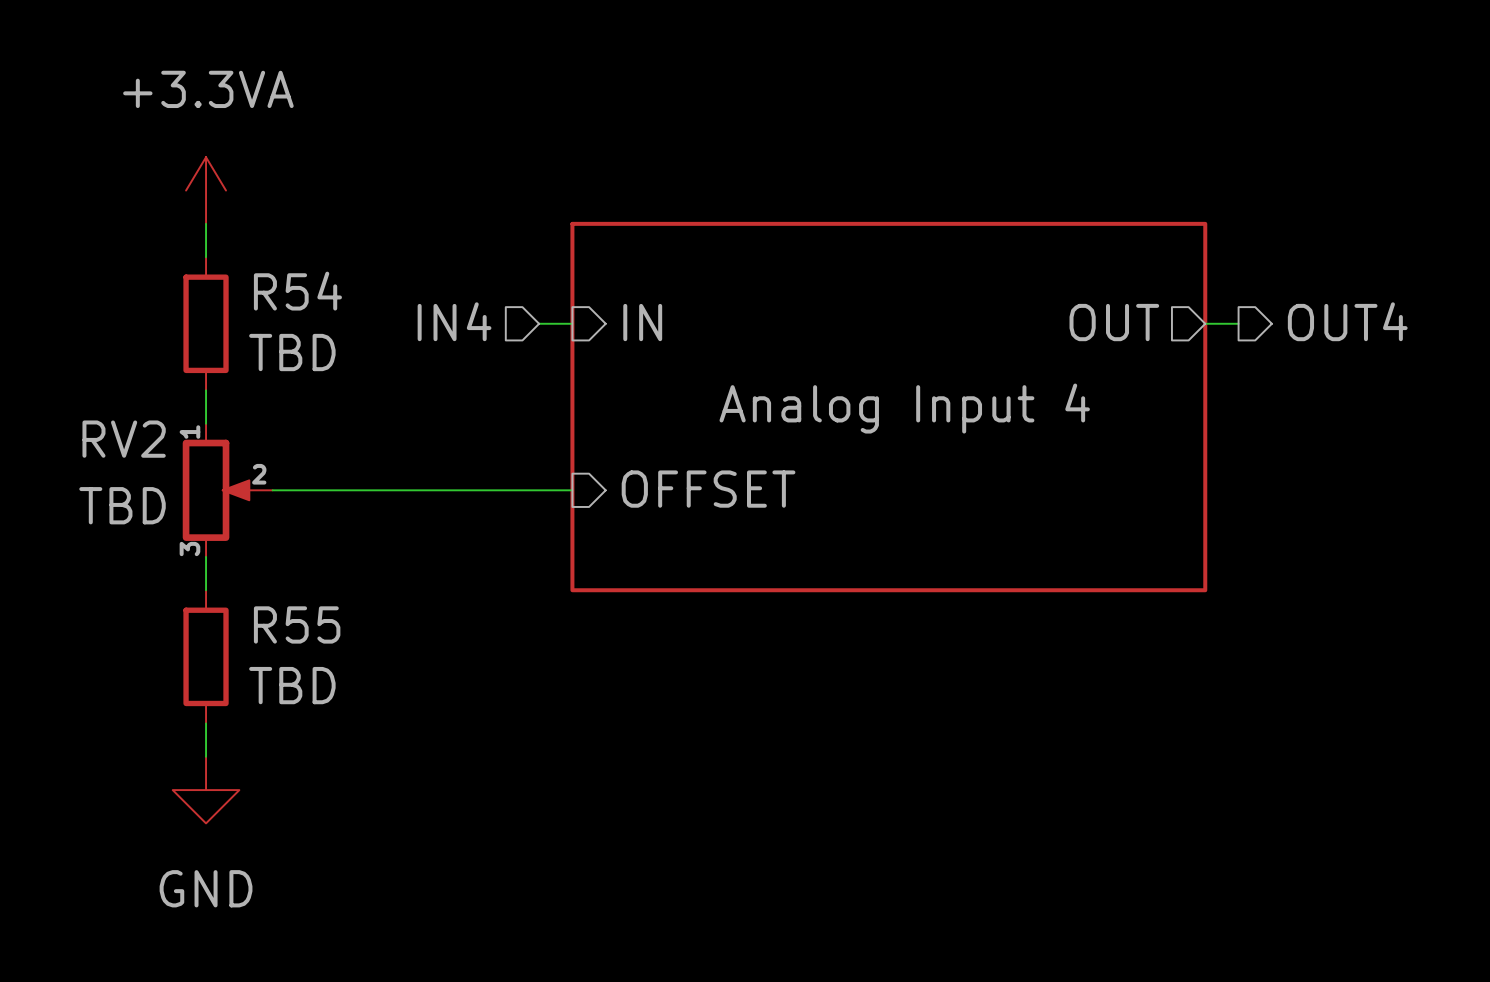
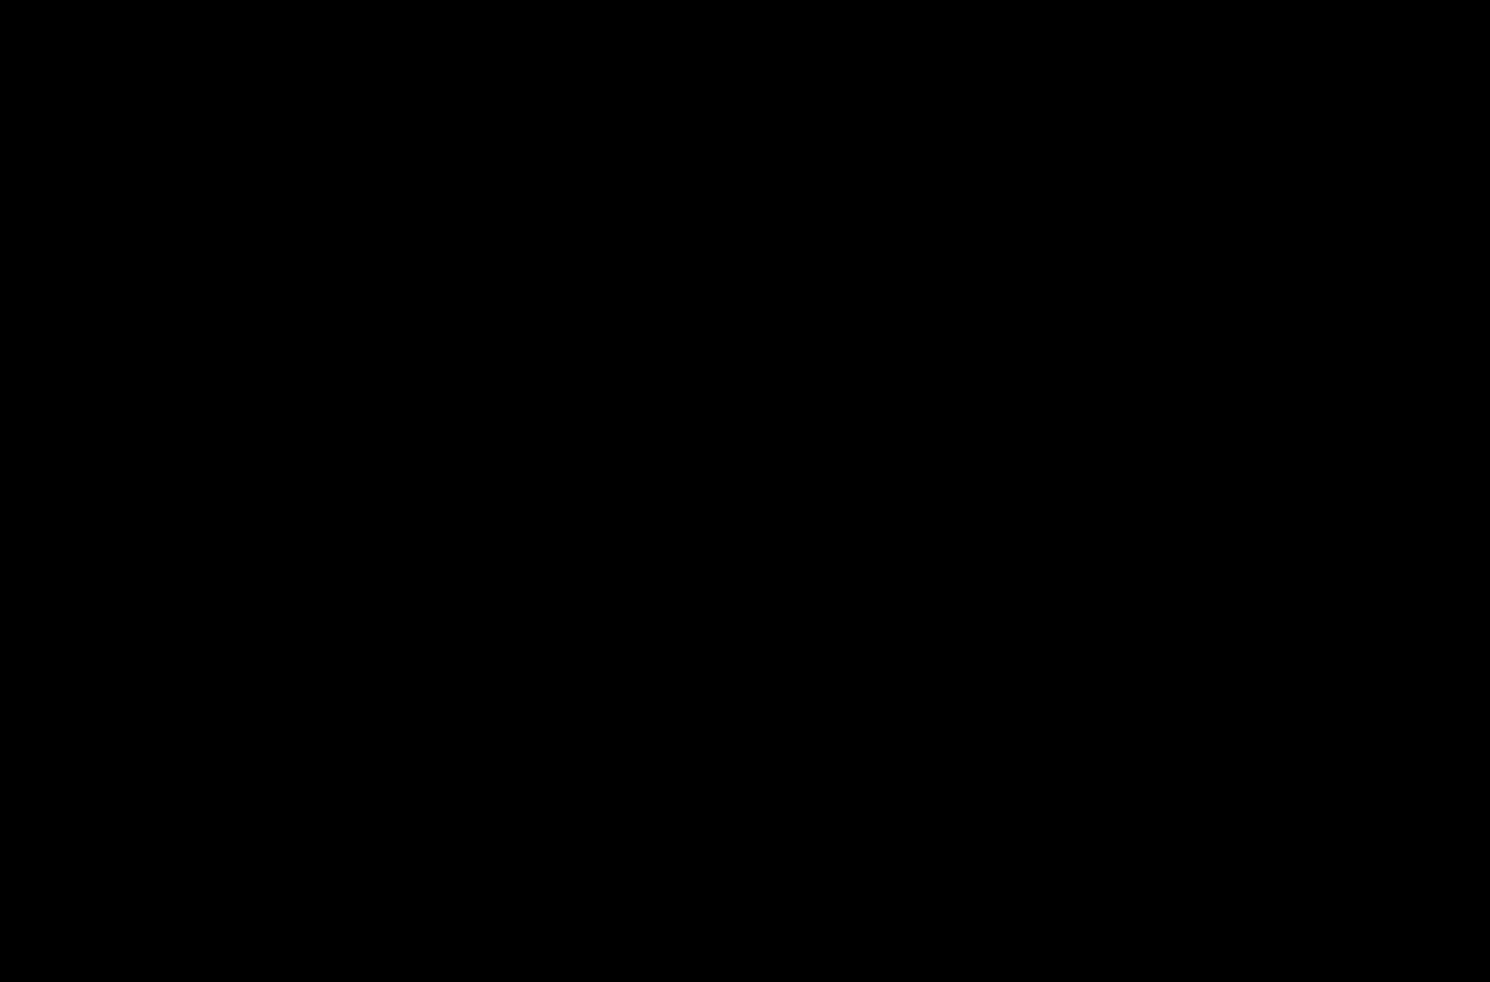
power symbol: +3.3VA (206, 190) -> none
wire: (206, 223) (206, 257) -> none
hierarchical label: IN4 (454, 321) -> none
hierarchical label: OUT4 (1347, 321) -> none
sheet pin: IN (642, 322) -> none
sheet pin: OUT (1114, 322) -> none
R54: TBD (206, 323) -> none
wire: (539, 323) (572, 323) -> none
wire: (1205, 323) (1238, 323) -> none
wire: (206, 390) (206, 423) -> none
sheet Analog Input 4: (888, 407) -> none
sheet pin: OFFSET (708, 489) -> none
RV2: TBD (227, 490) -> none
wire: (272, 490) (572, 490) -> none
wire: (206, 556) (206, 590) -> none
R55: TBD (206, 656) -> none
wire: (206, 723) (206, 756) -> none
power symbol: GND (206, 790) -> none

